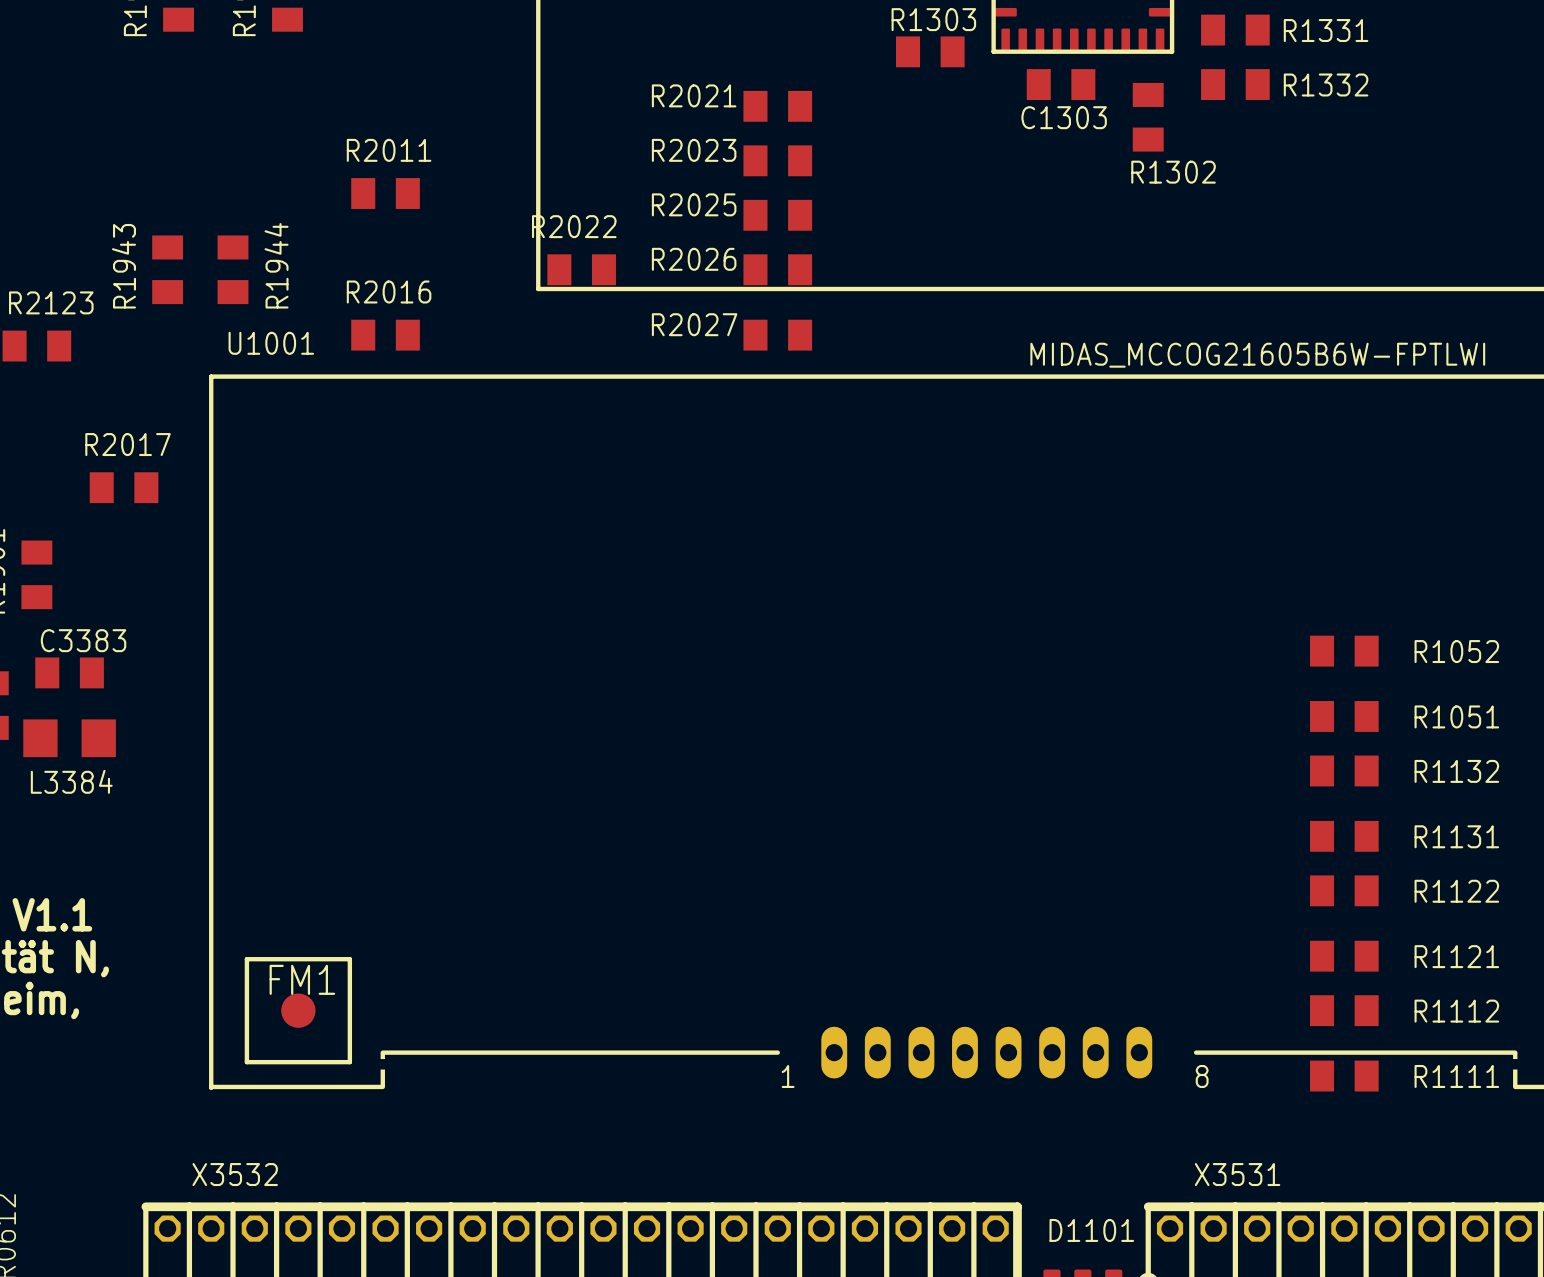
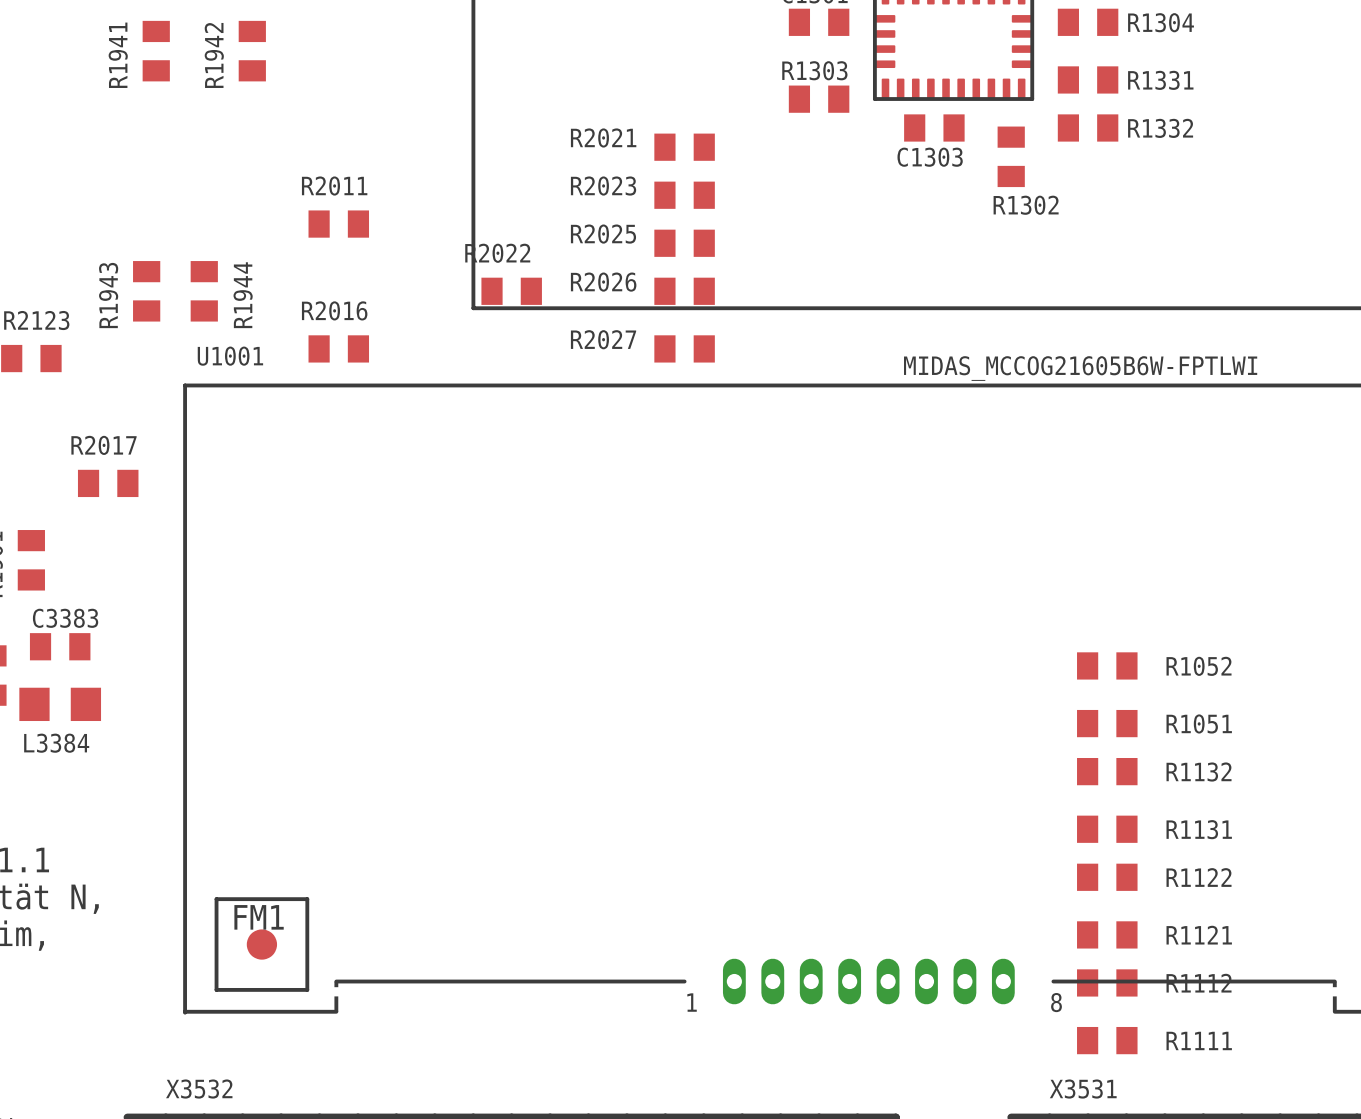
R1052 position: (1344, 651) -> (1107, 665)
R1051 position: (1344, 716) -> (1107, 723)
R1132 position: (1344, 770) -> (1107, 771)
R1131 position: (1344, 836) -> (1107, 829)
R1122 position: (1344, 890) -> (1107, 877)
R1121 position: (1344, 956) -> (1107, 934)
R1112 position: (1344, 1010) -> (1107, 982)
R1111 position: (1344, 1076) -> (1107, 1040)

